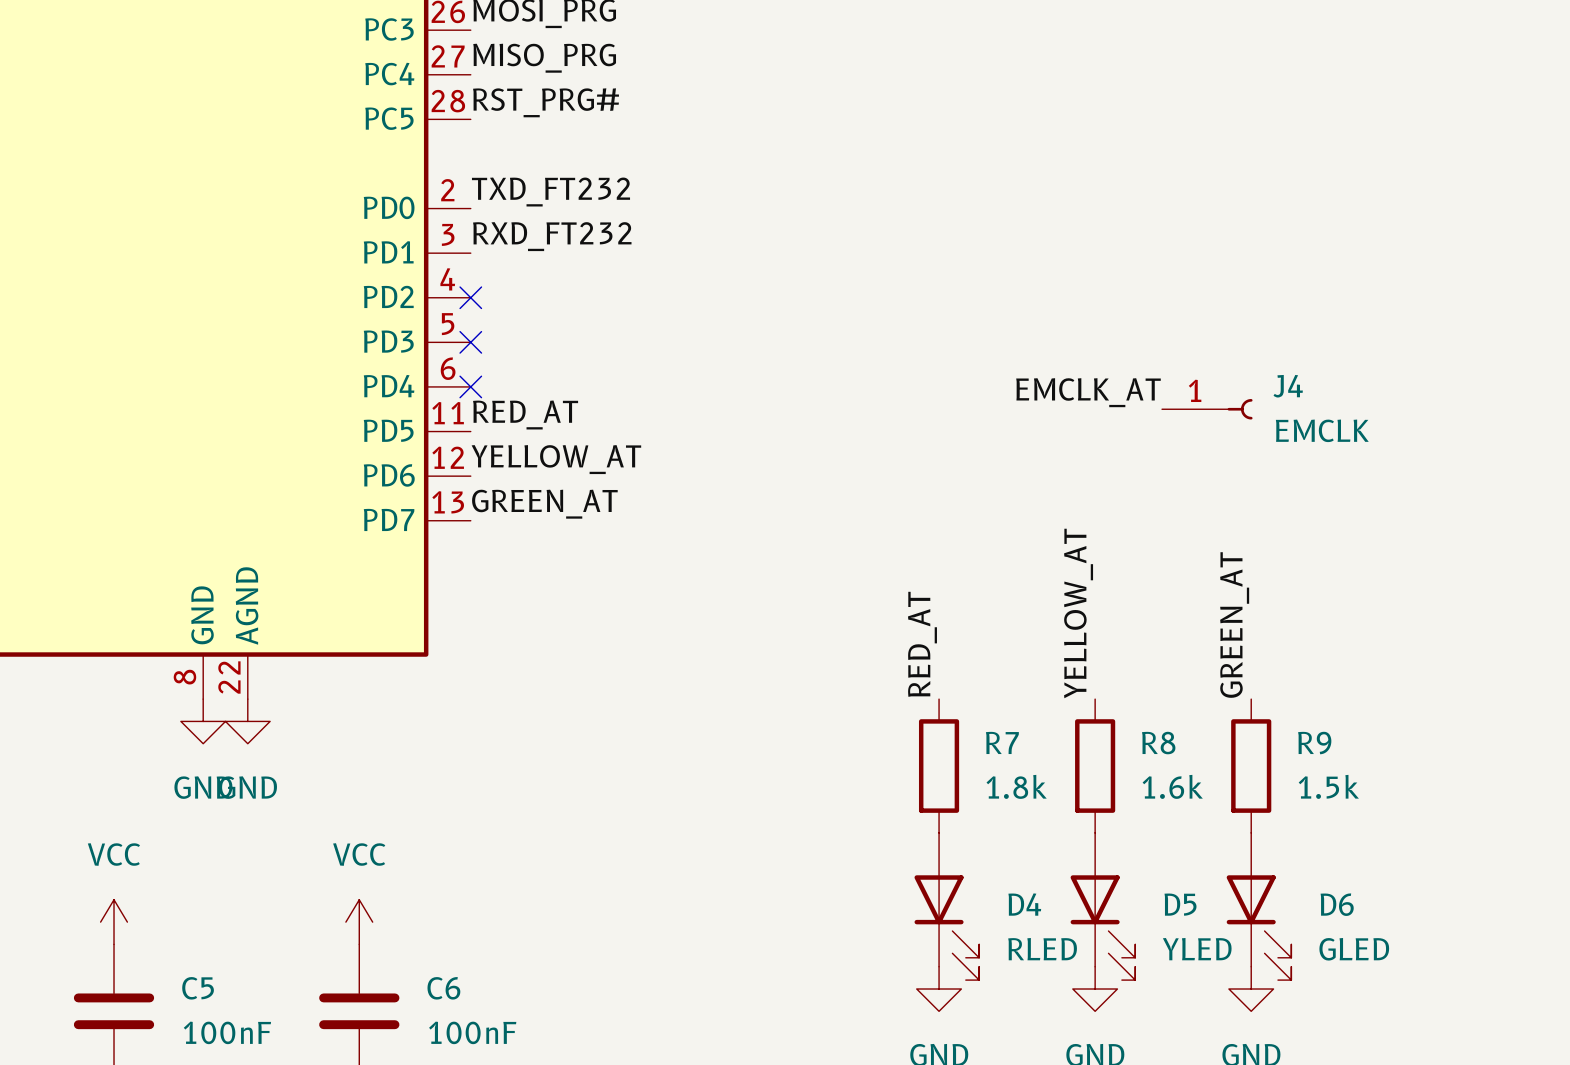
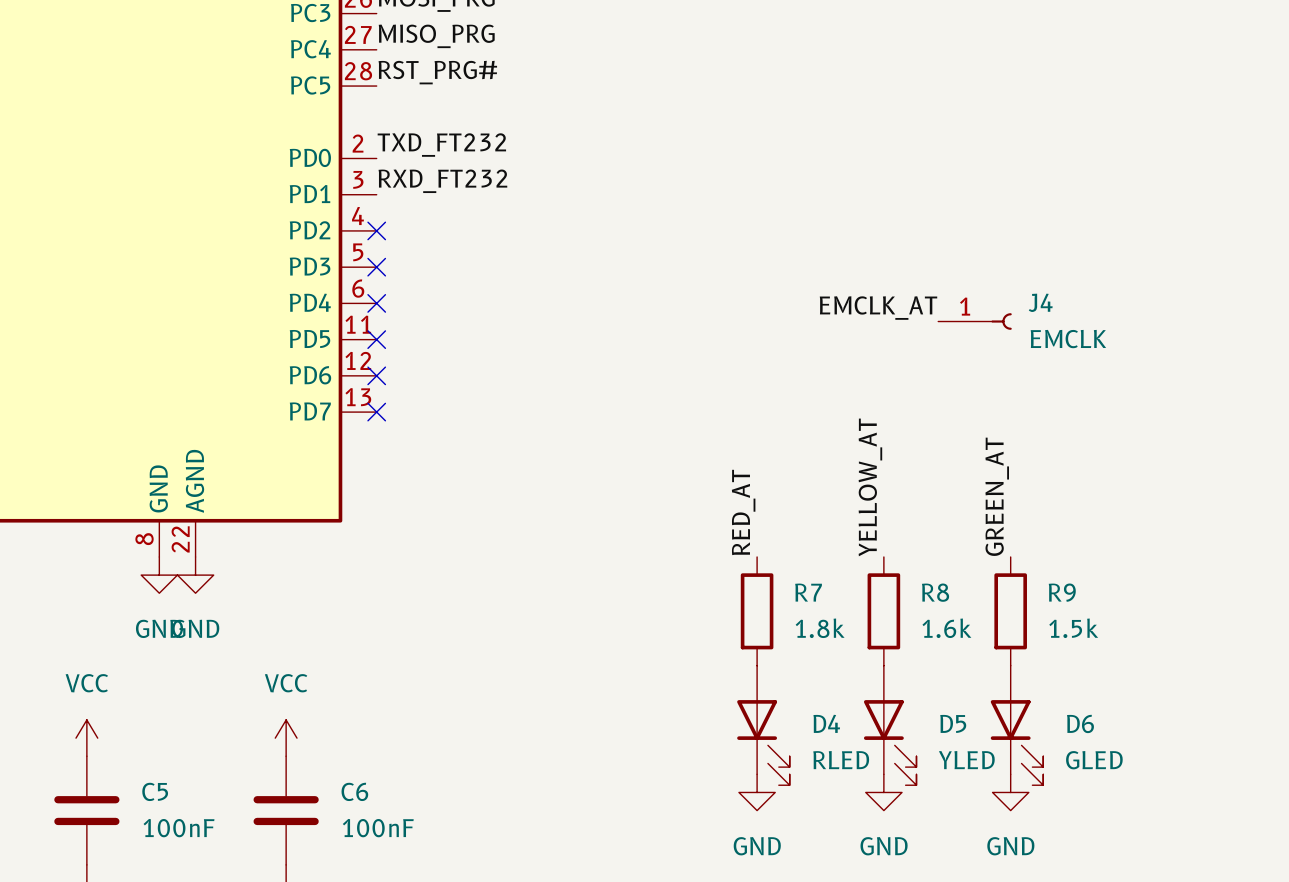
label: RED_AT (525, 414) -> none
no-connect mark: none -> (376, 339)
label: YELLOW_AT (556, 459) -> none
no-connect mark: none -> (376, 375)
label: GREEN_AT (544, 504) -> none
no-connect mark: none -> (376, 412)

